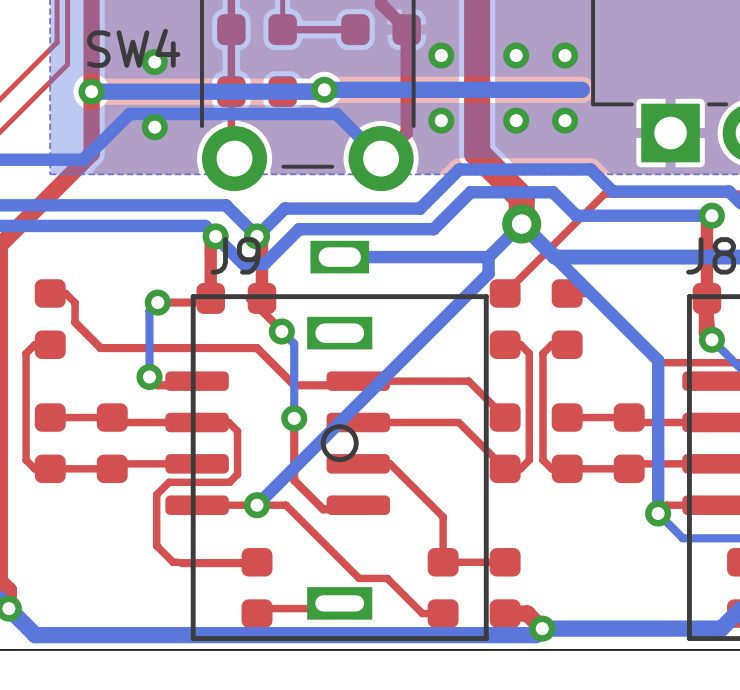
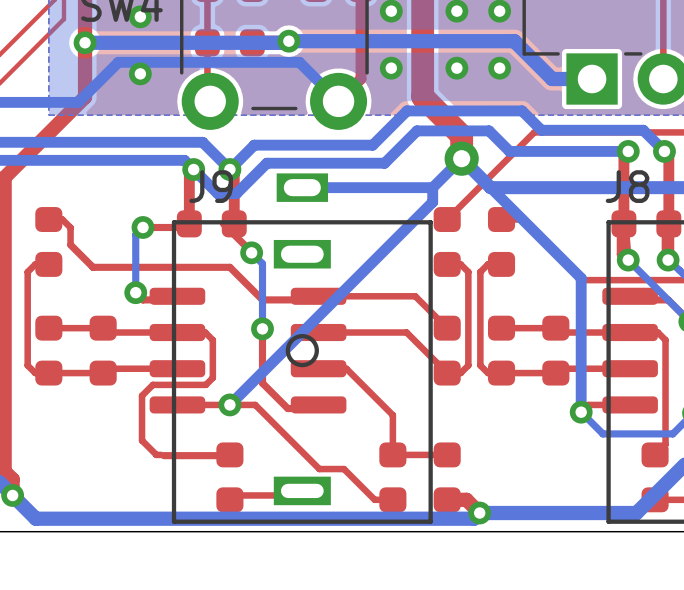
bottom track: none -> (514, 41) (552, 79) (592, 79)

